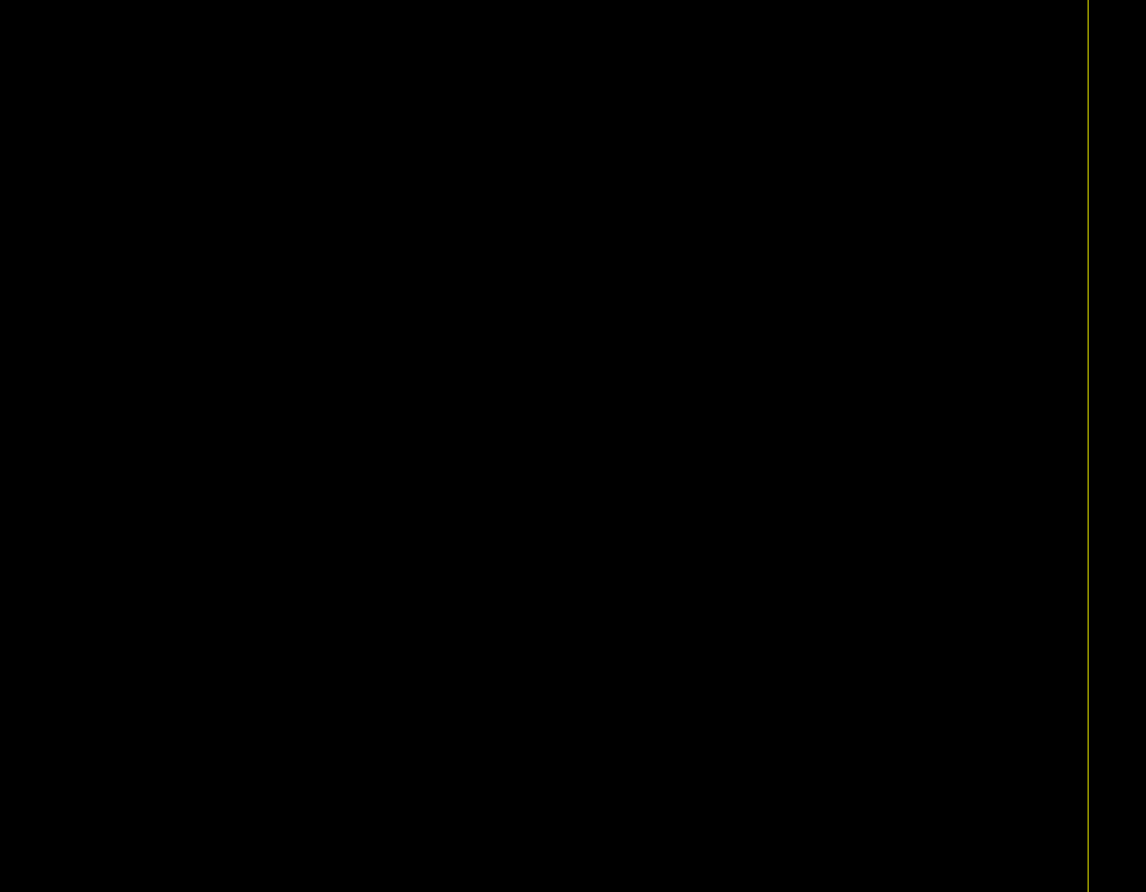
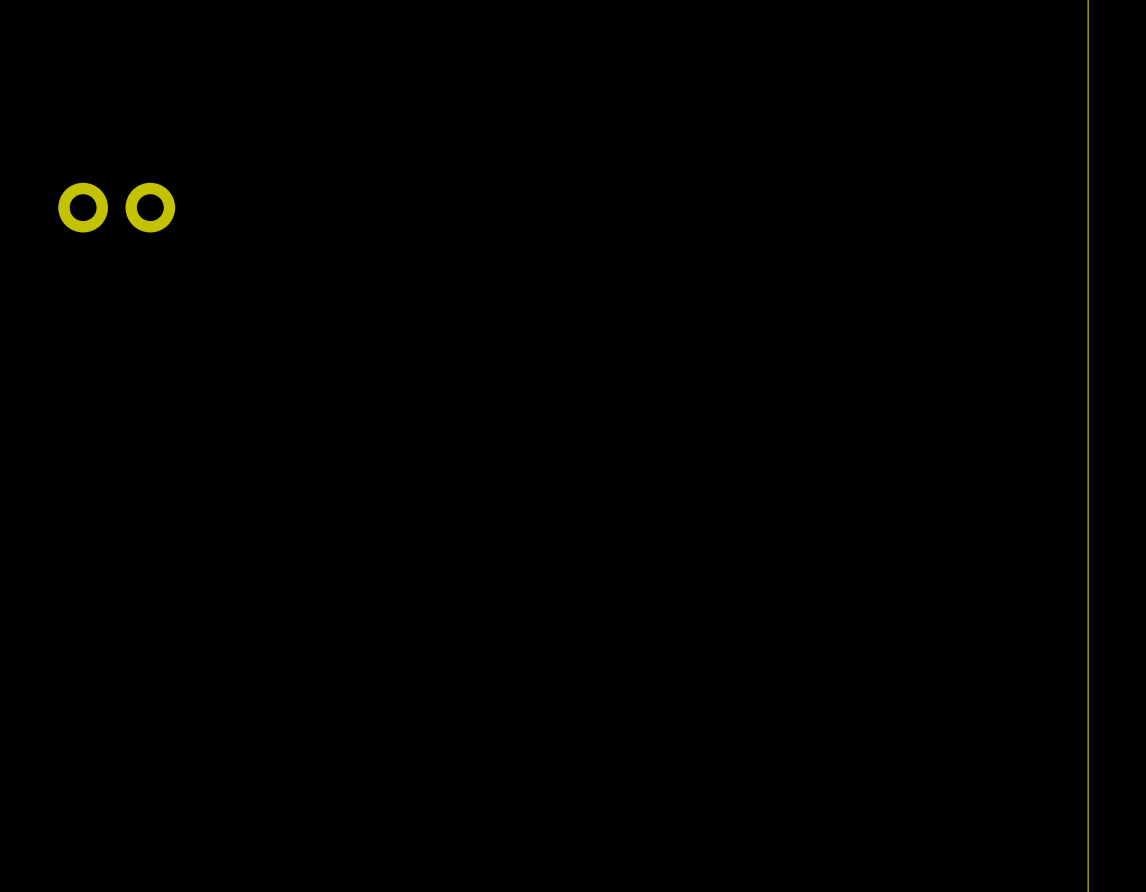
part: none -> (116, 207)

